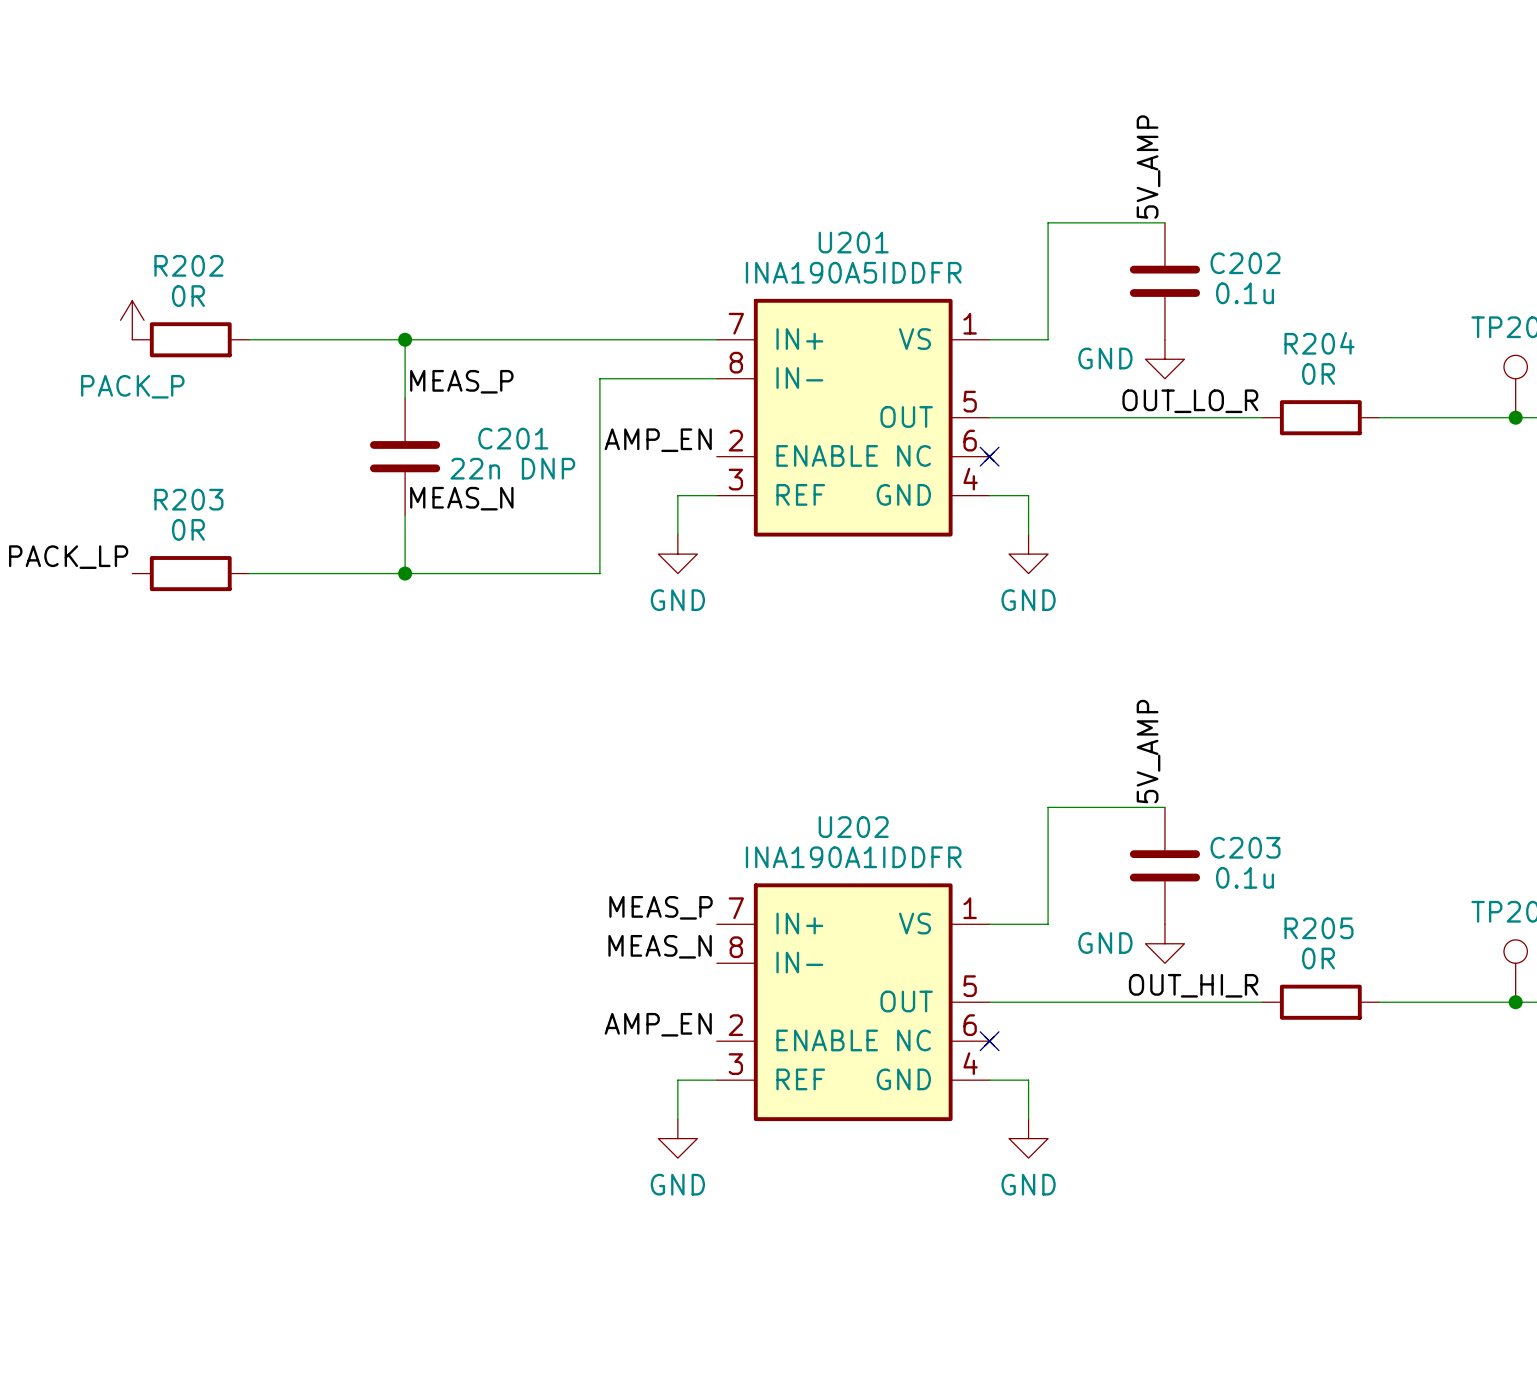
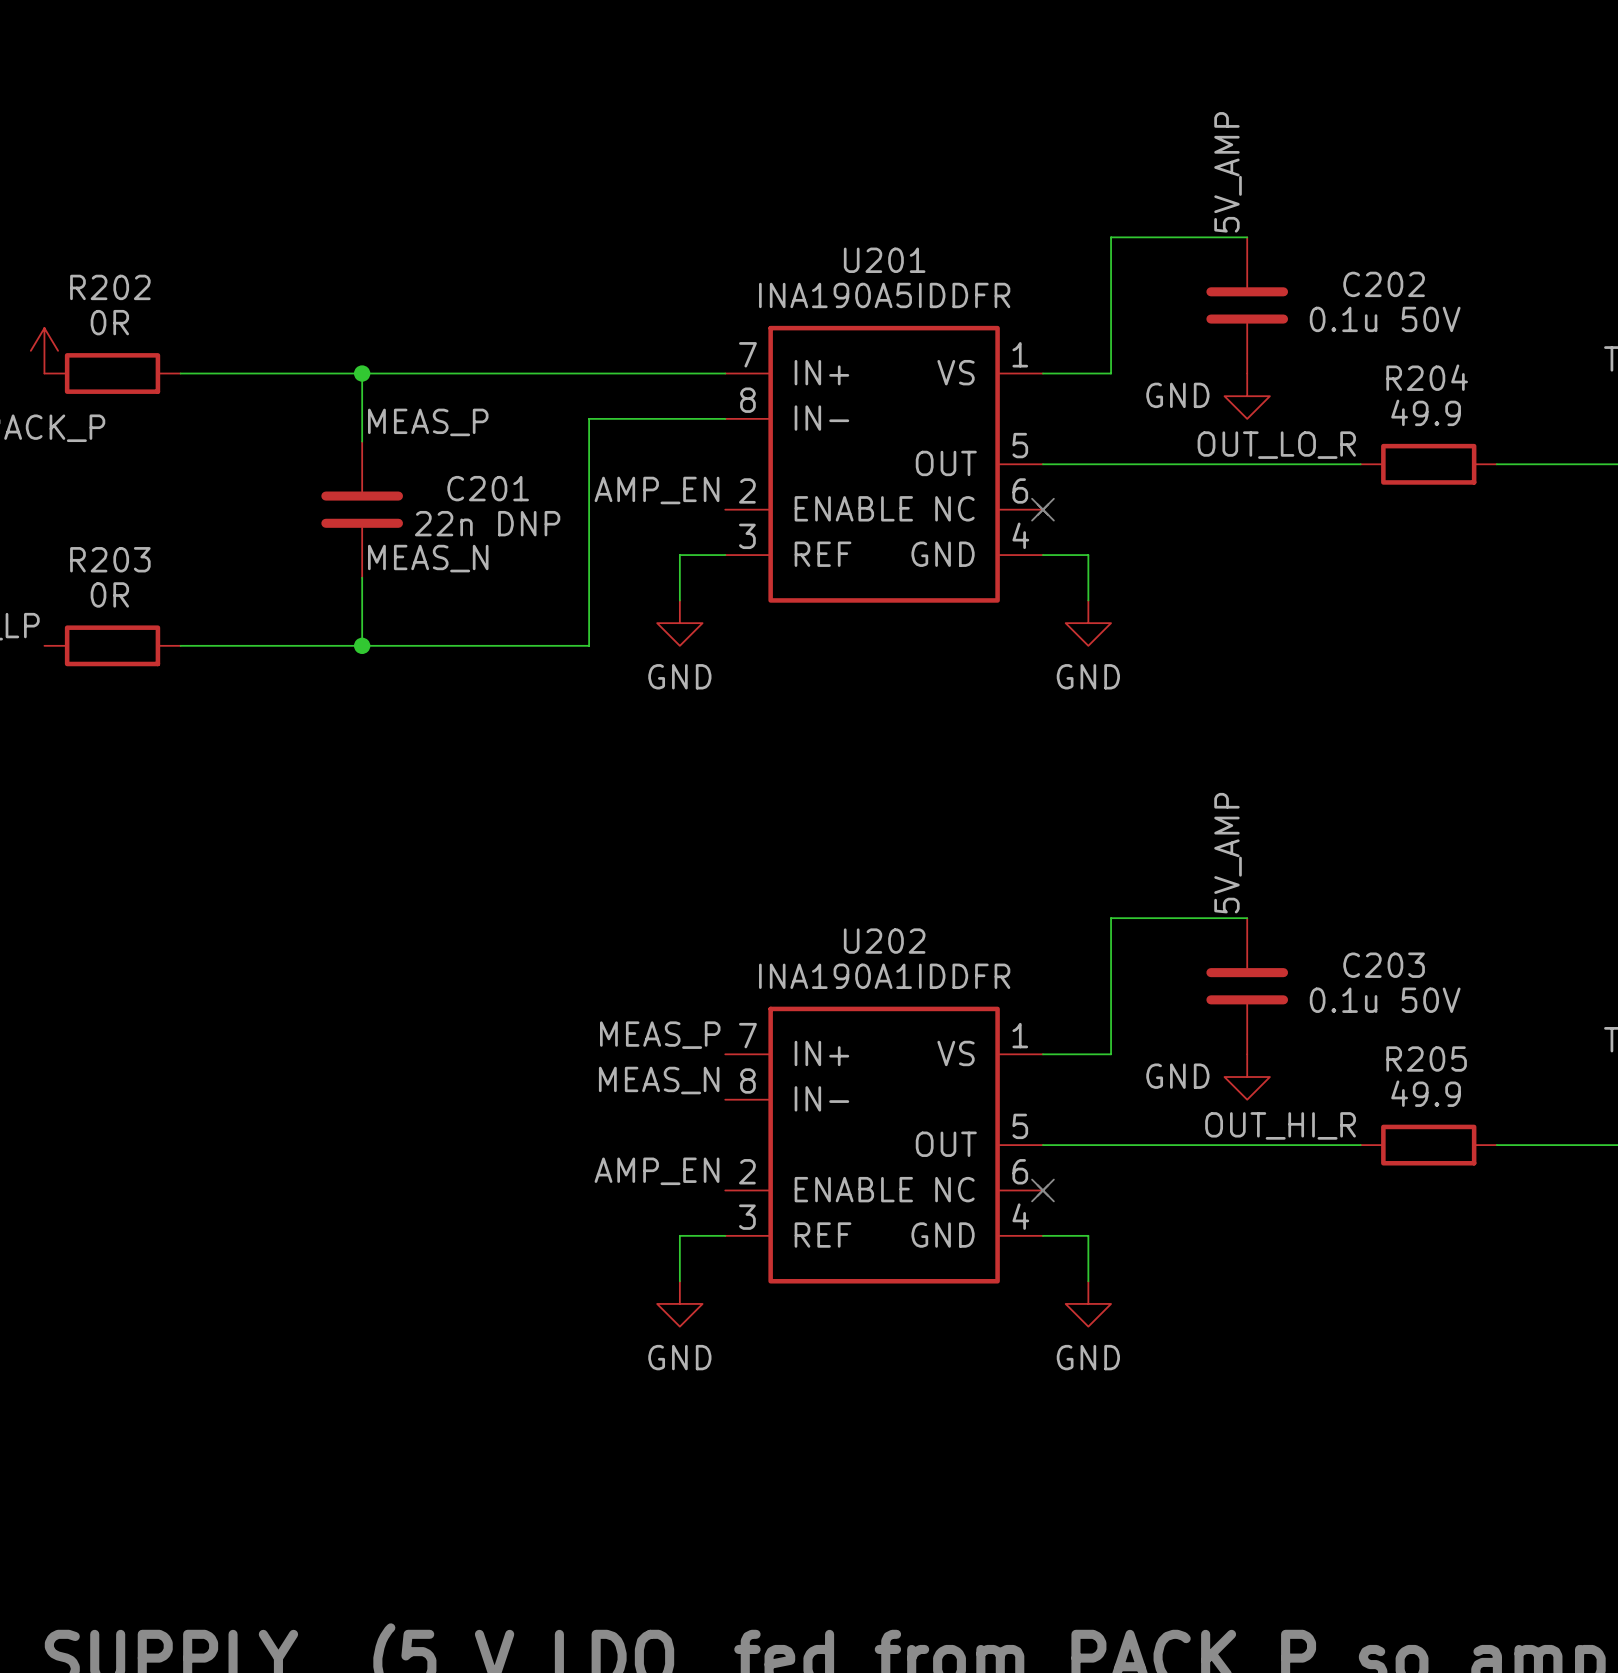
C202 name position: C202 (1245, 263) -> C202 (1384, 284)
C202 value: 0.1u (1245, 293) -> 0.1u 50V (1385, 319)
R204 value: 0R (1318, 374) -> 49.9 (1426, 412)
C203 name position: C203 (1245, 847) -> C203 (1384, 965)
C203 value: 0.1u (1245, 877) -> 0.1u 50V (1385, 1000)
R205 value: 0R (1318, 958) -> 49.9 (1426, 1093)

